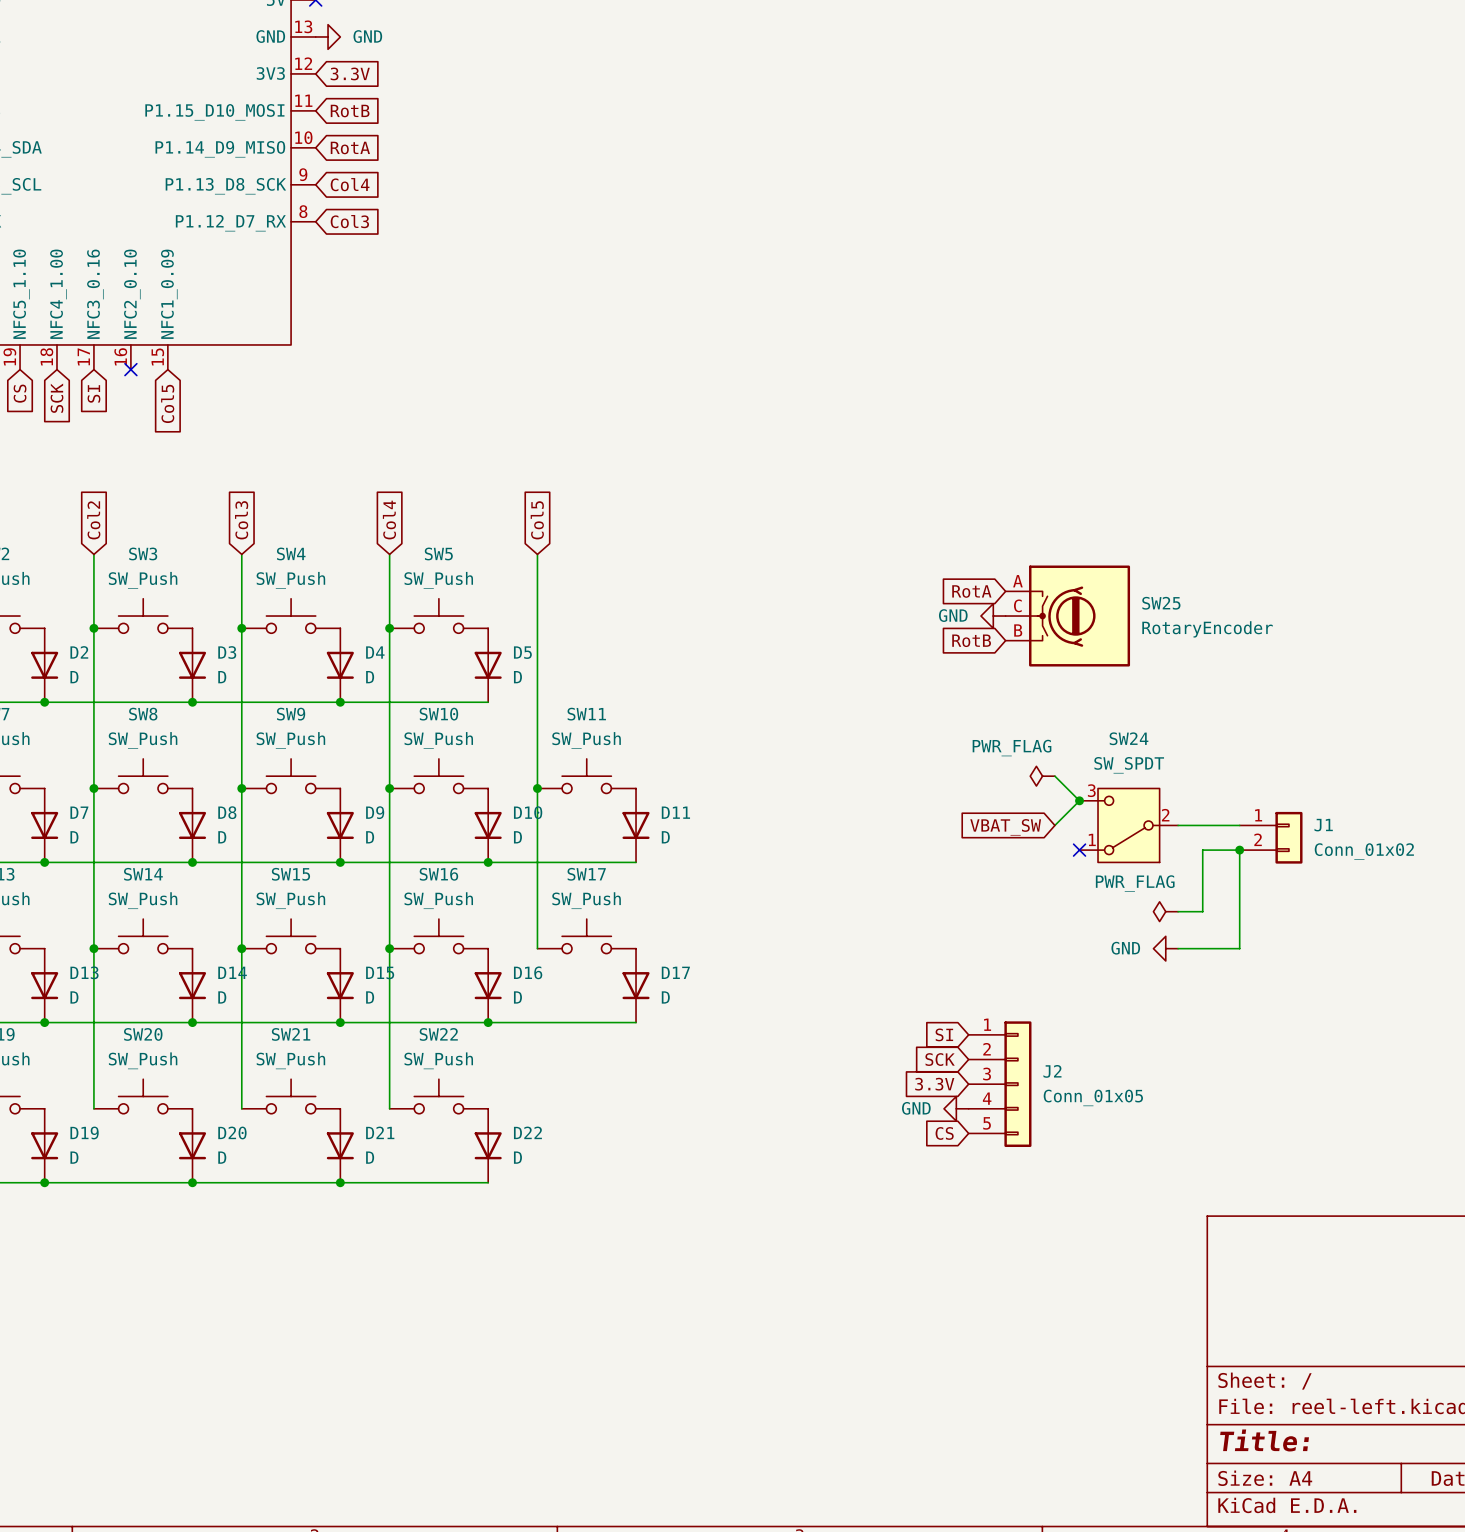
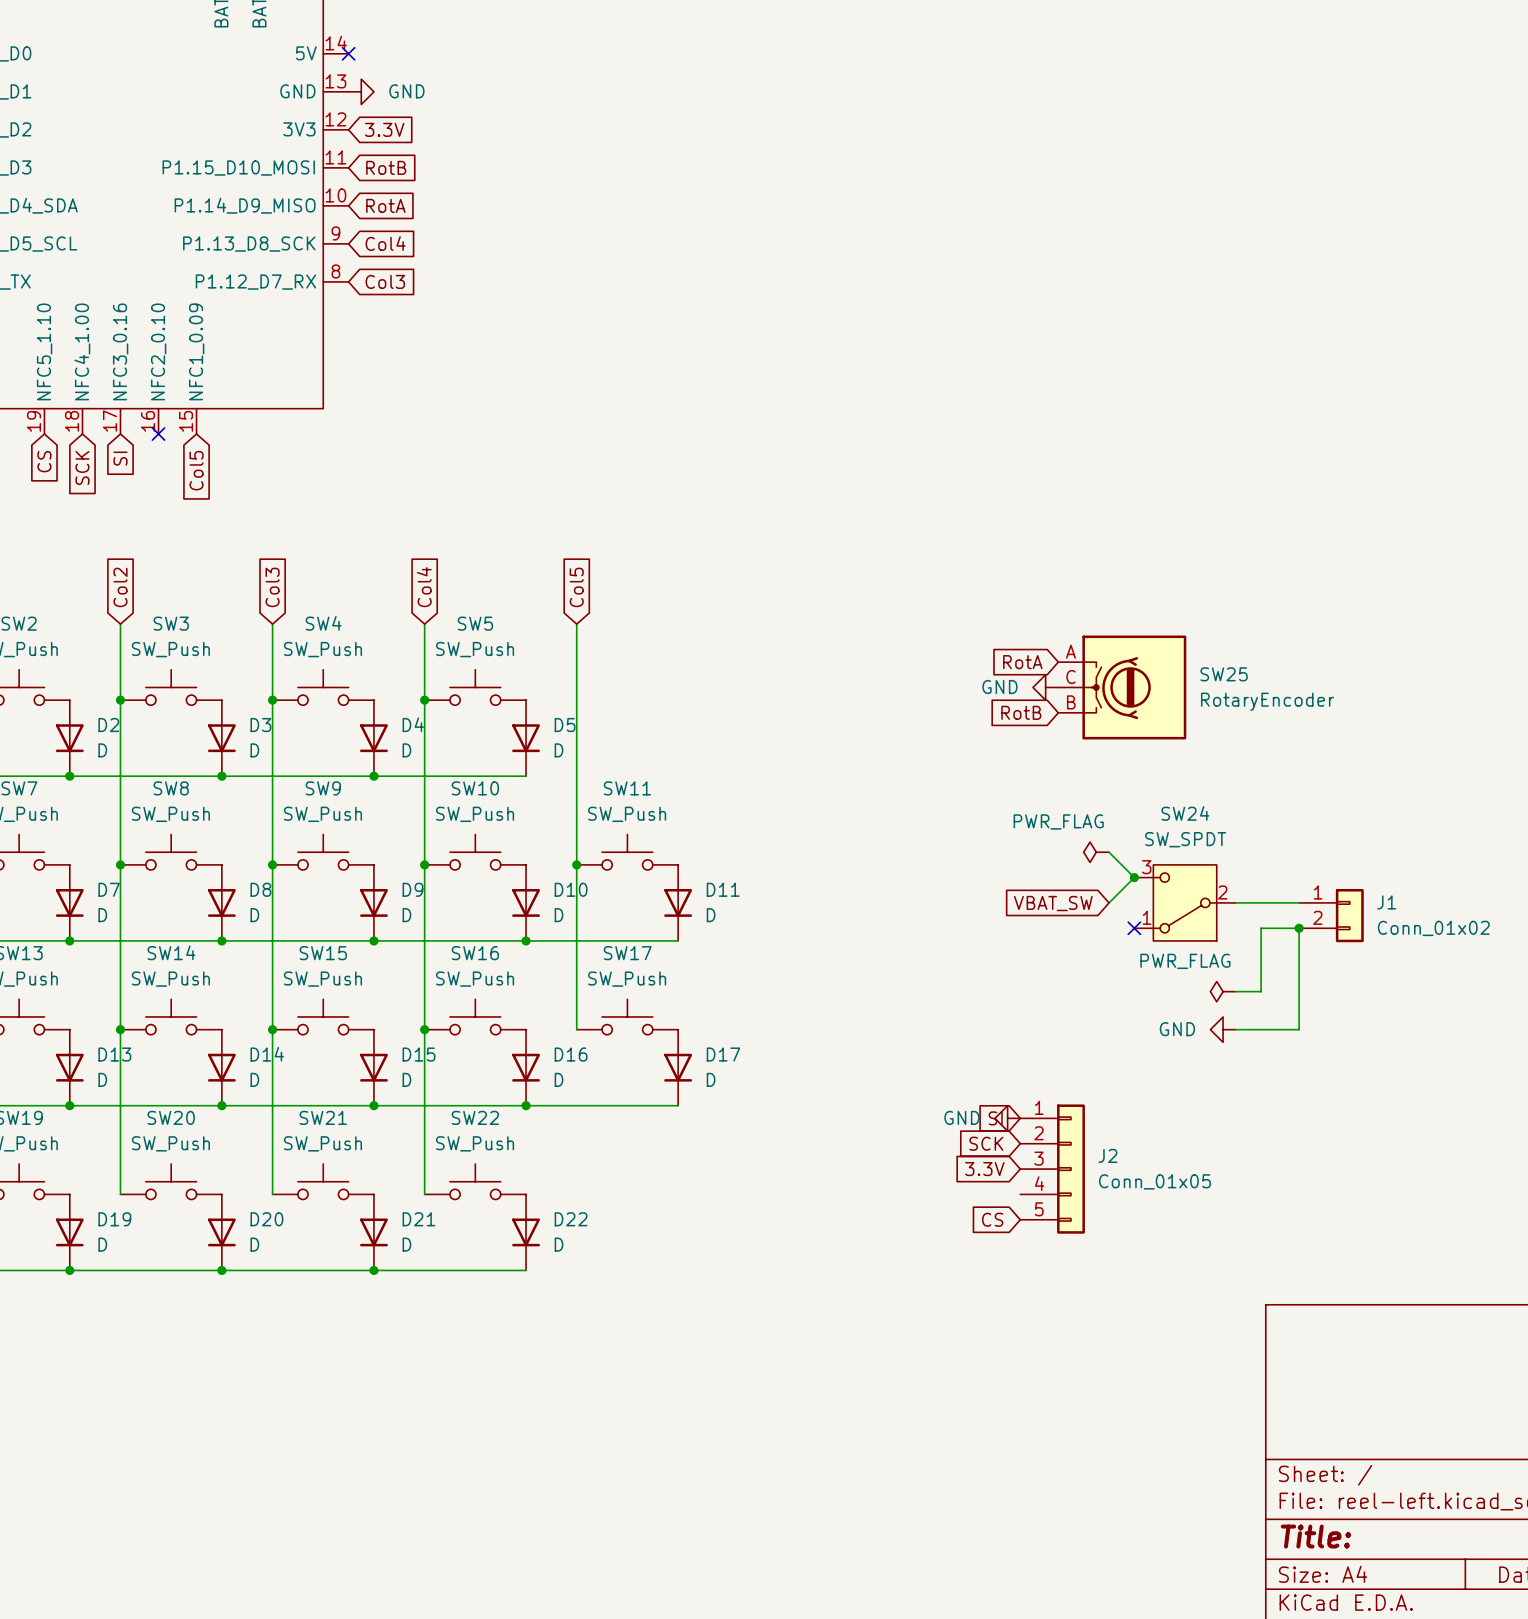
power symbol position: GND (956, 1108) -> GND (1007, 1118)

